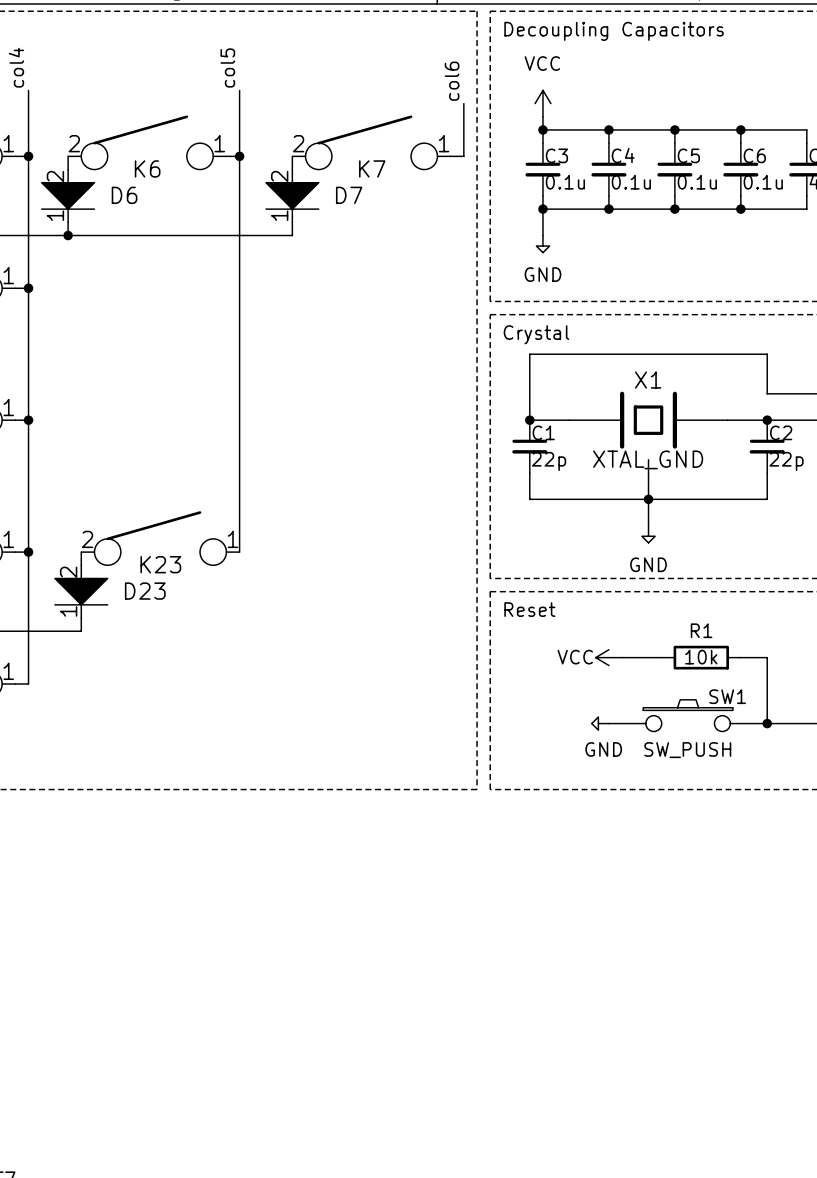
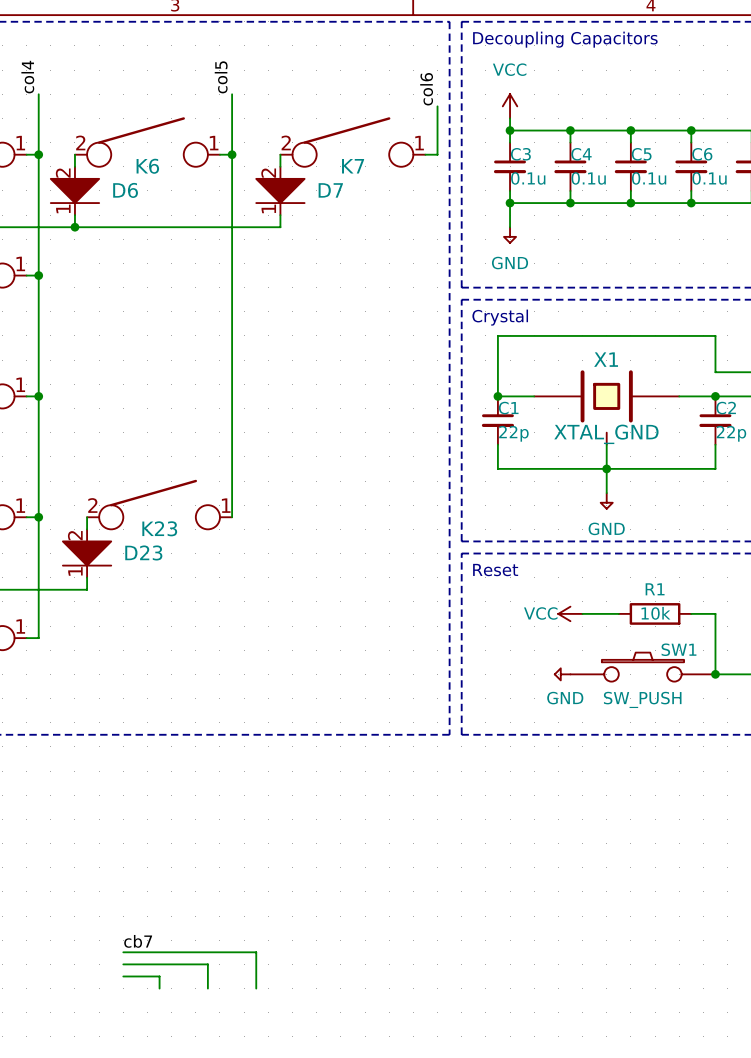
label: none -> cb7 (138, 941)
wire: none -> (123, 952) (256, 952) (256, 988)
wire: none -> (123, 964) (207, 964) (207, 988)
wire: none -> (123, 976) (159, 976) (159, 988)

